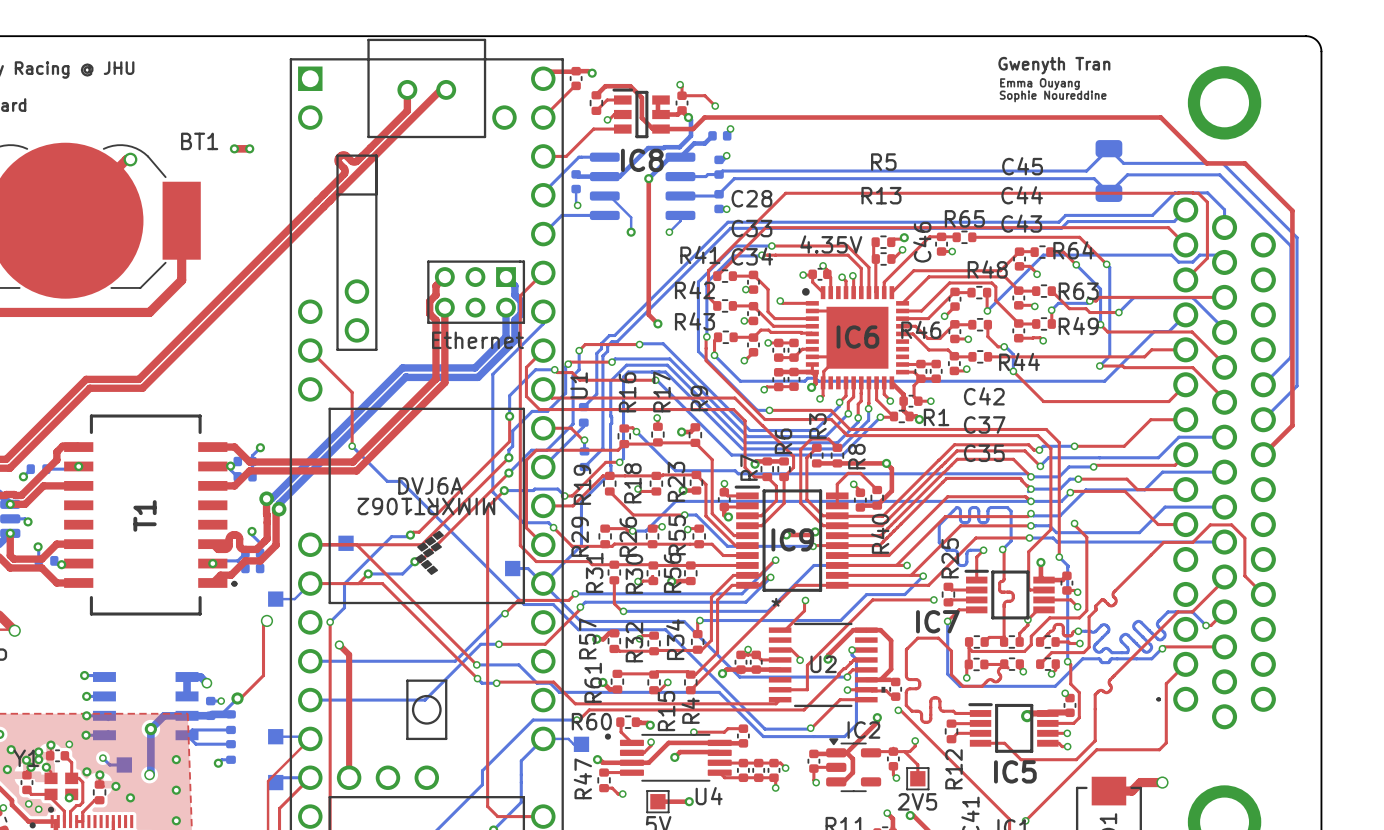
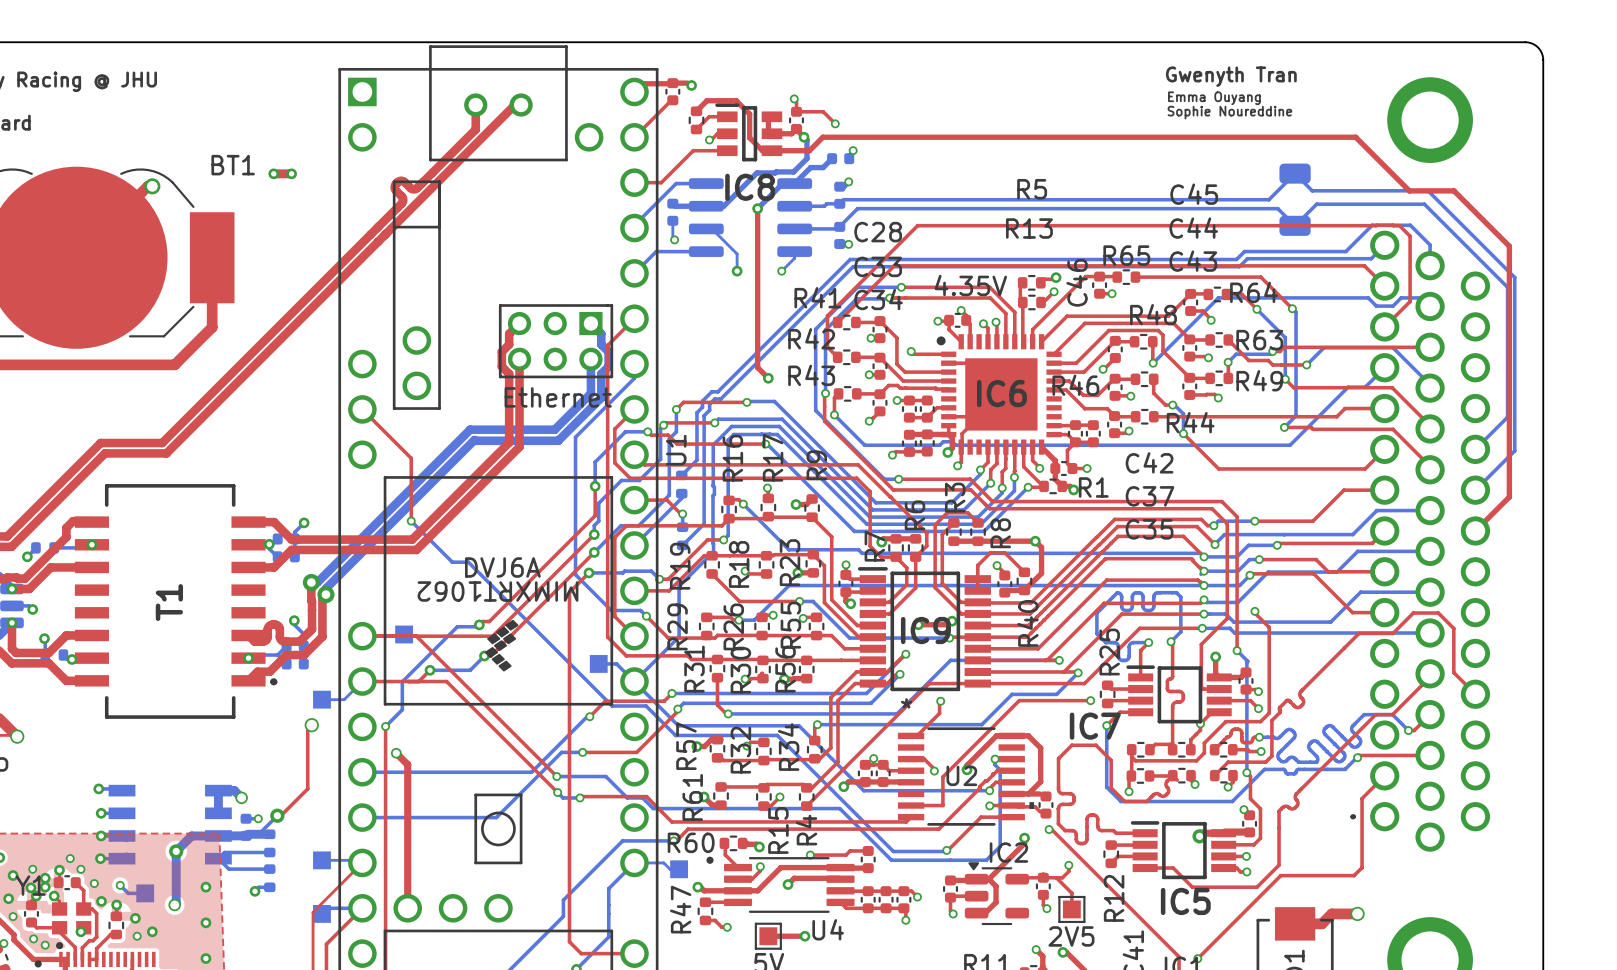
via: none -> (70, 858)
via: none -> (32, 869)
via: none -> (94, 883)
via: none -> (13, 916)
via: none -> (137, 936)

